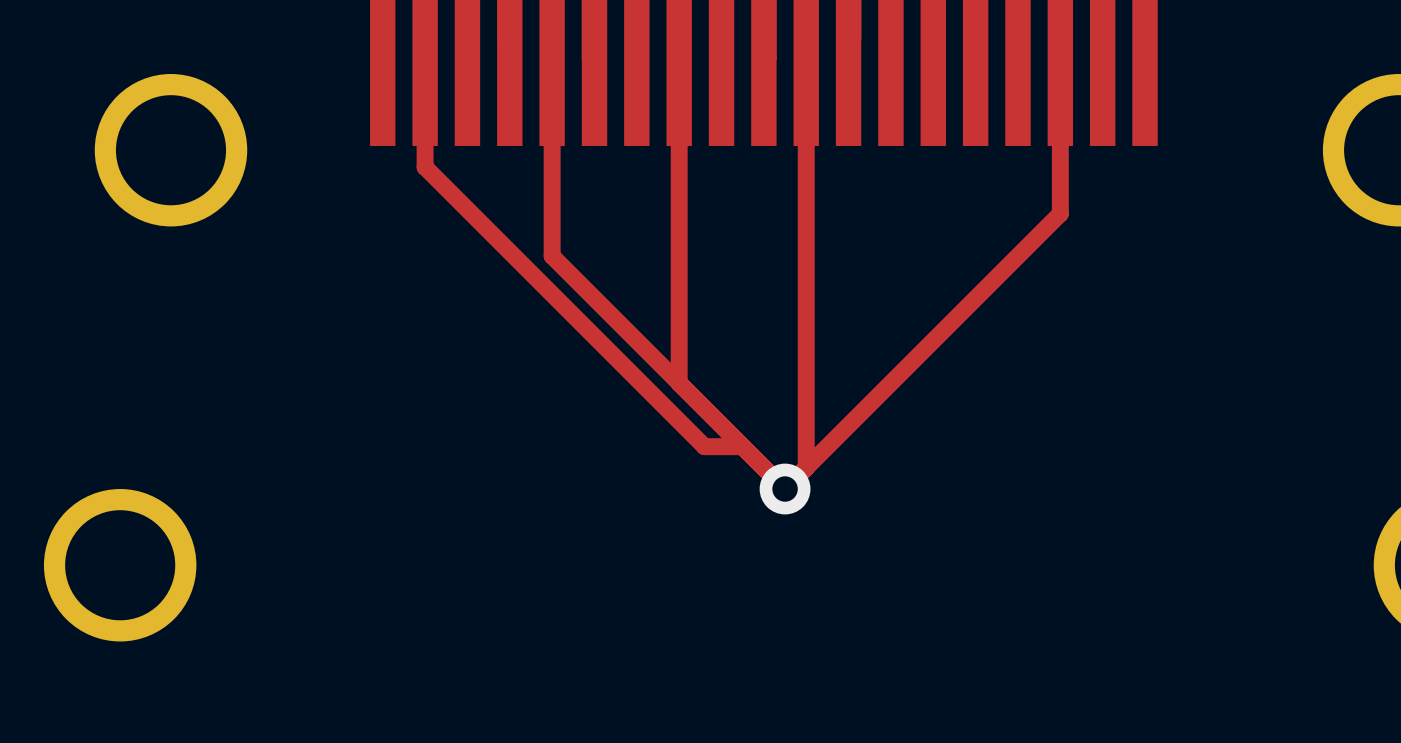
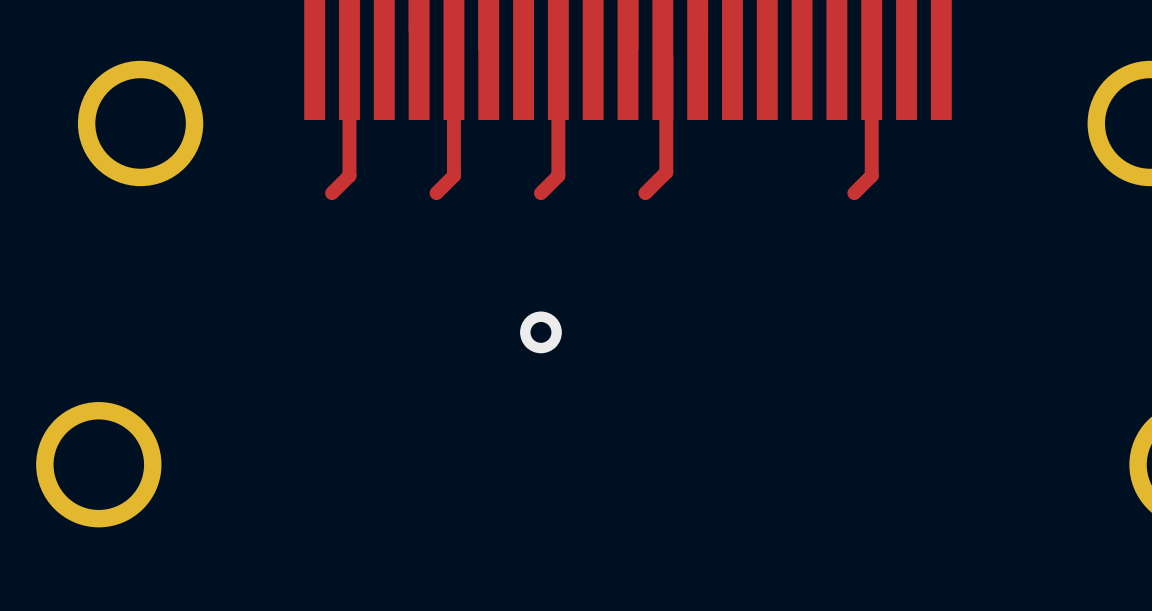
top track: (806, 65) (806, 467) -> (662, 53) (666, 57) (666, 172) (645, 193)
top track: (425, 167) (704, 446) (742, 446) -> (349, 137) (349, 175) (332, 193)
top track: (552, 213) (552, 256) (785, 489) (1039, 234) -> (453, 175) (436, 193)
top track: (679, 213) (679, 383) -> (558, 175) (540, 193)
via position: (785, 489) -> (540, 332)

